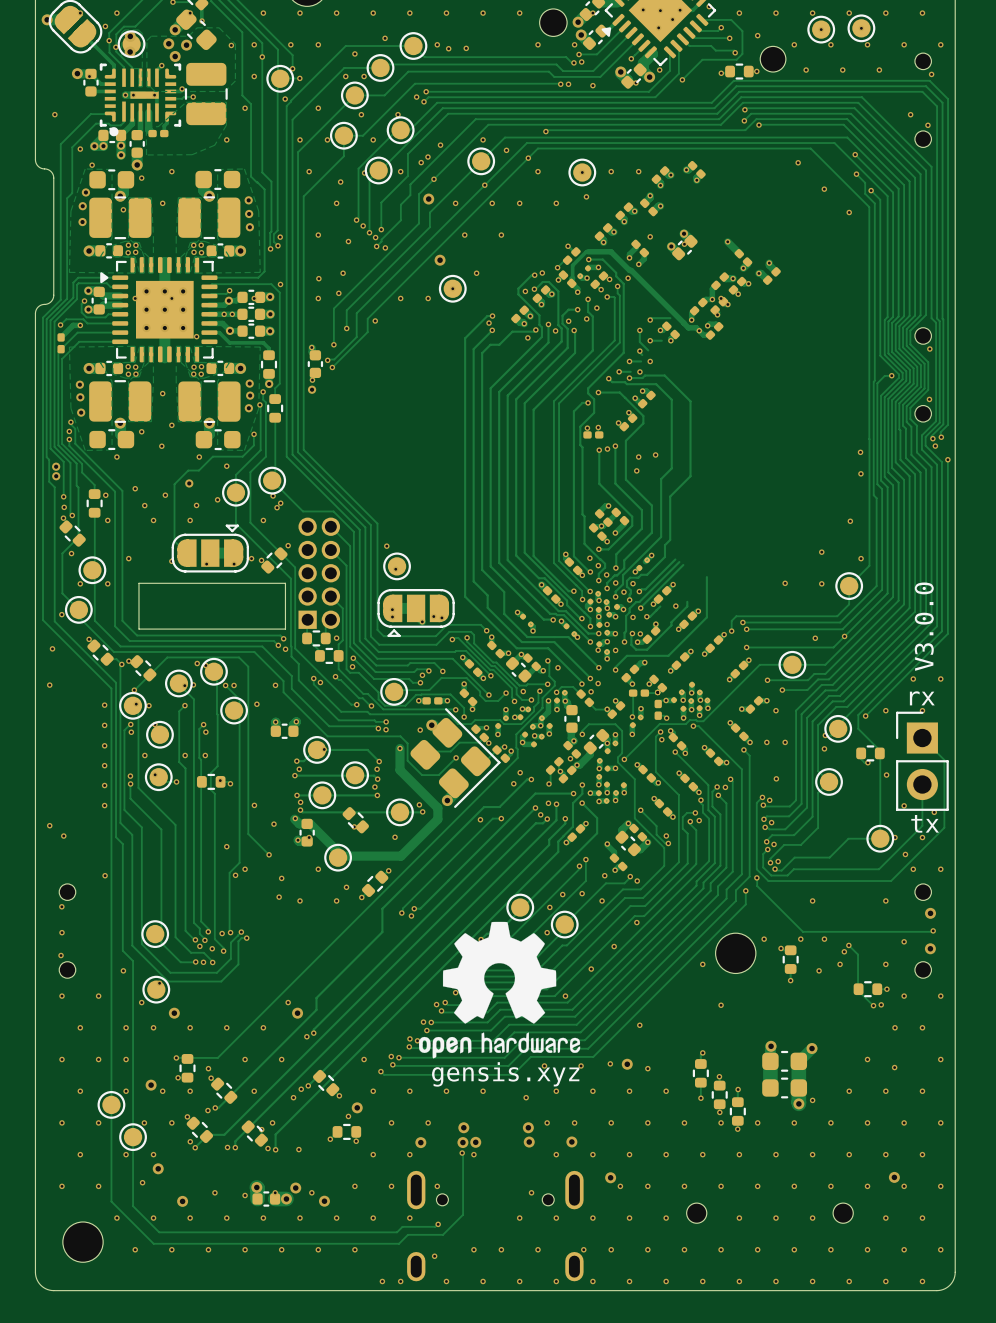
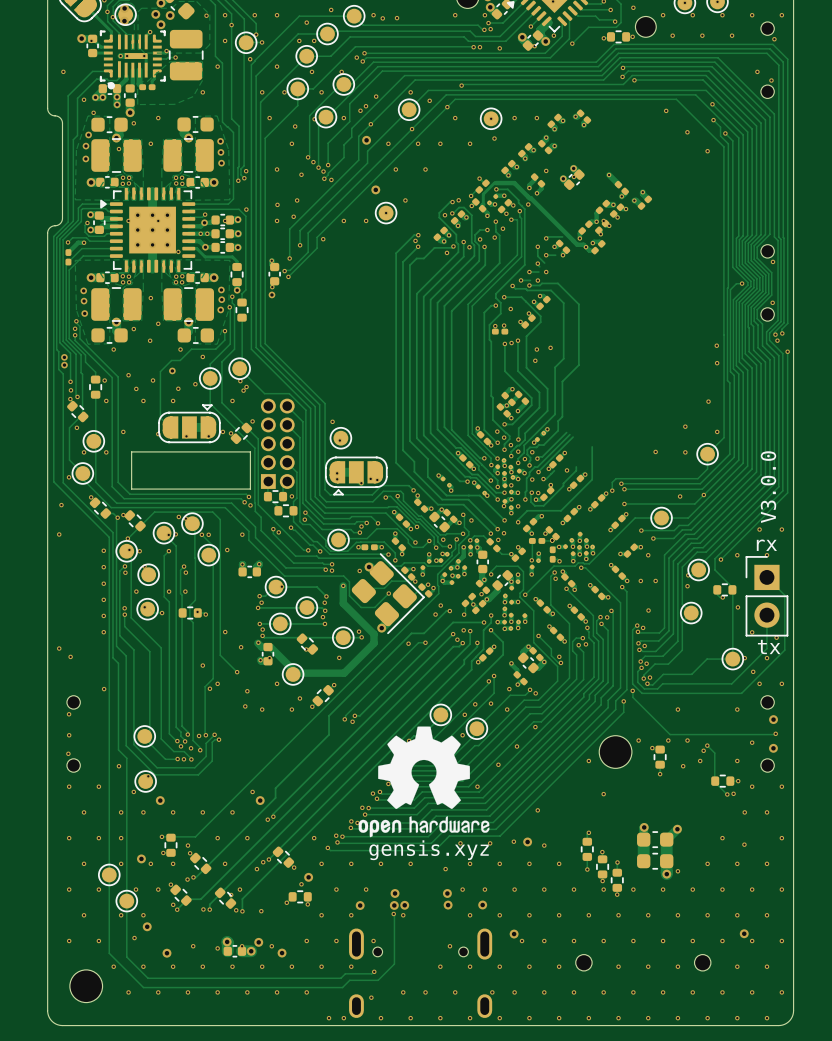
via: none -> (510, 308)

